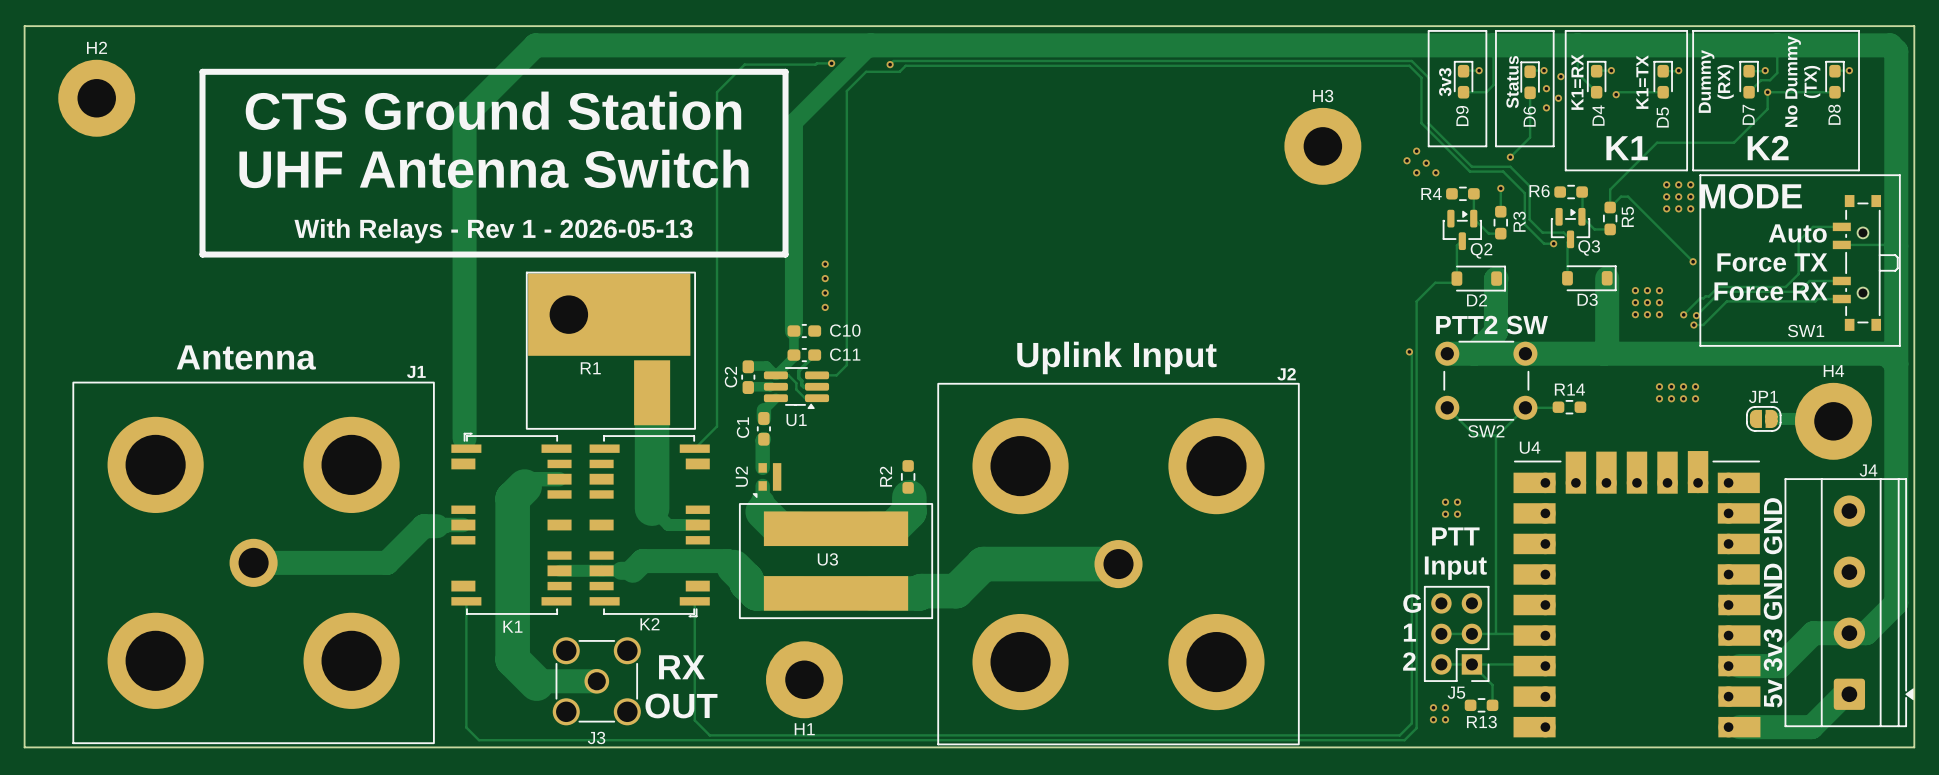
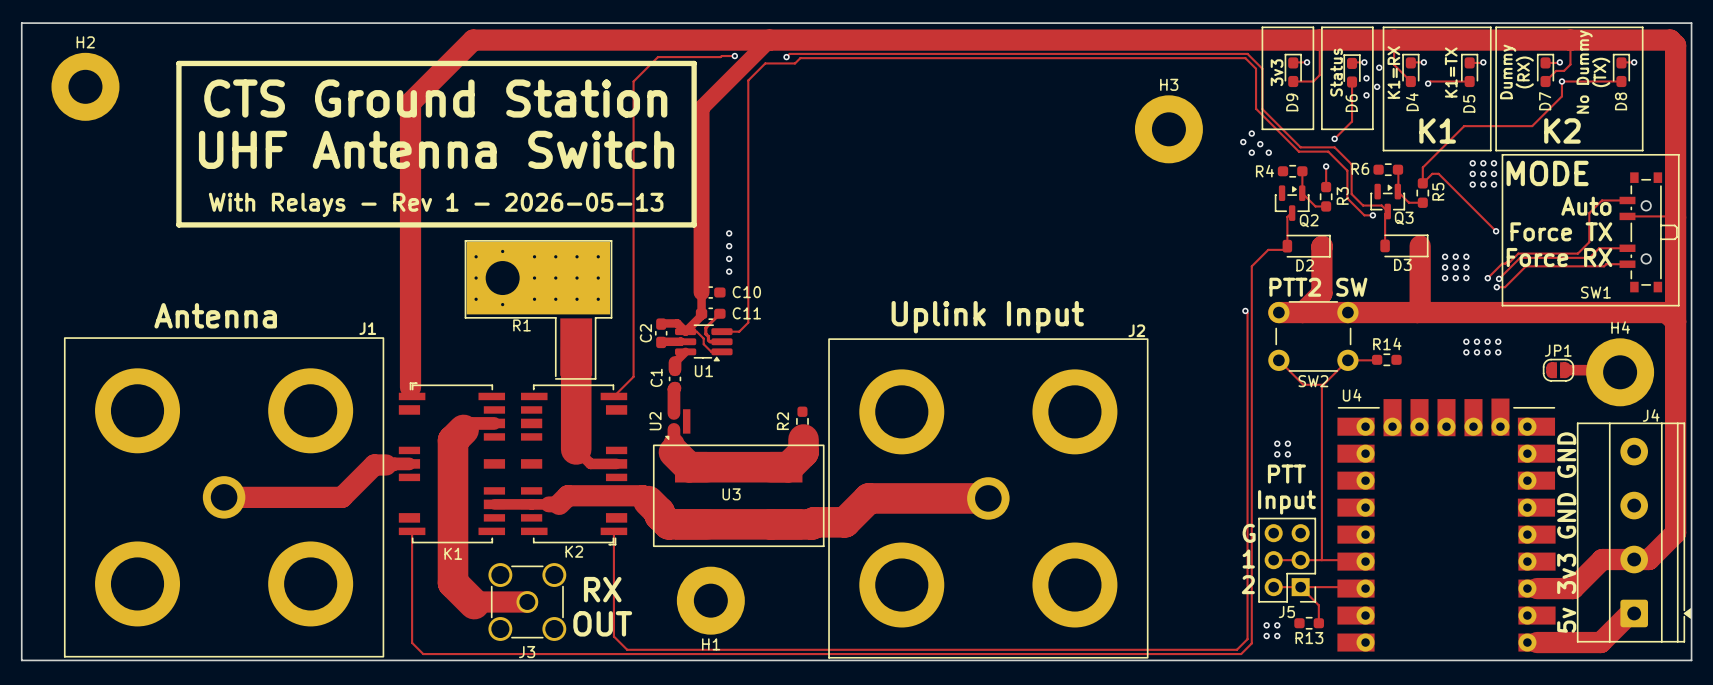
R1 footprint: [526, 271, 696, 430] -> [464, 240, 613, 380]

